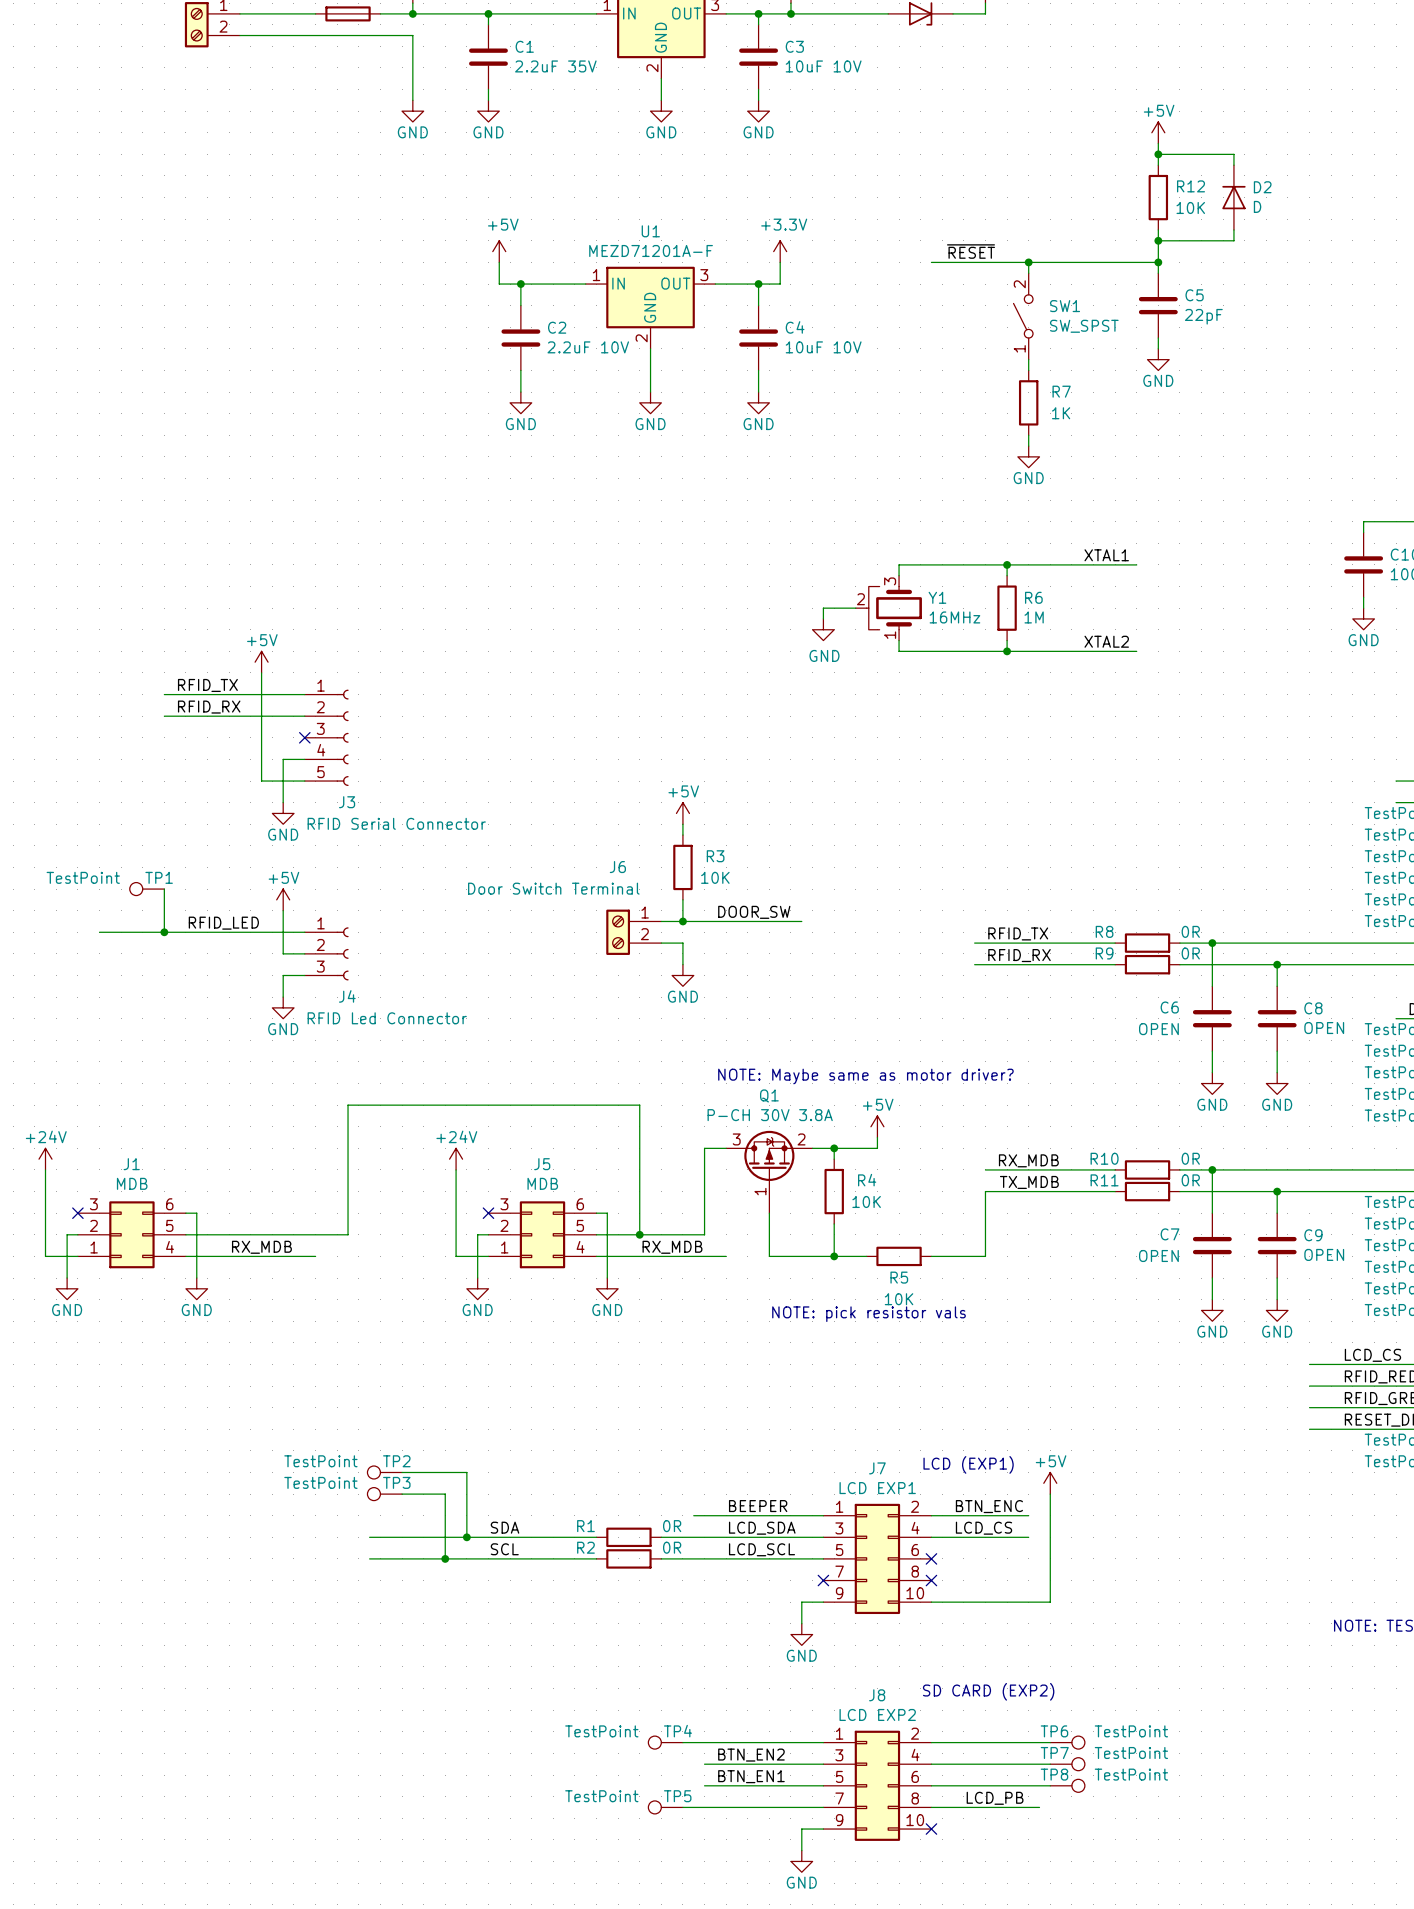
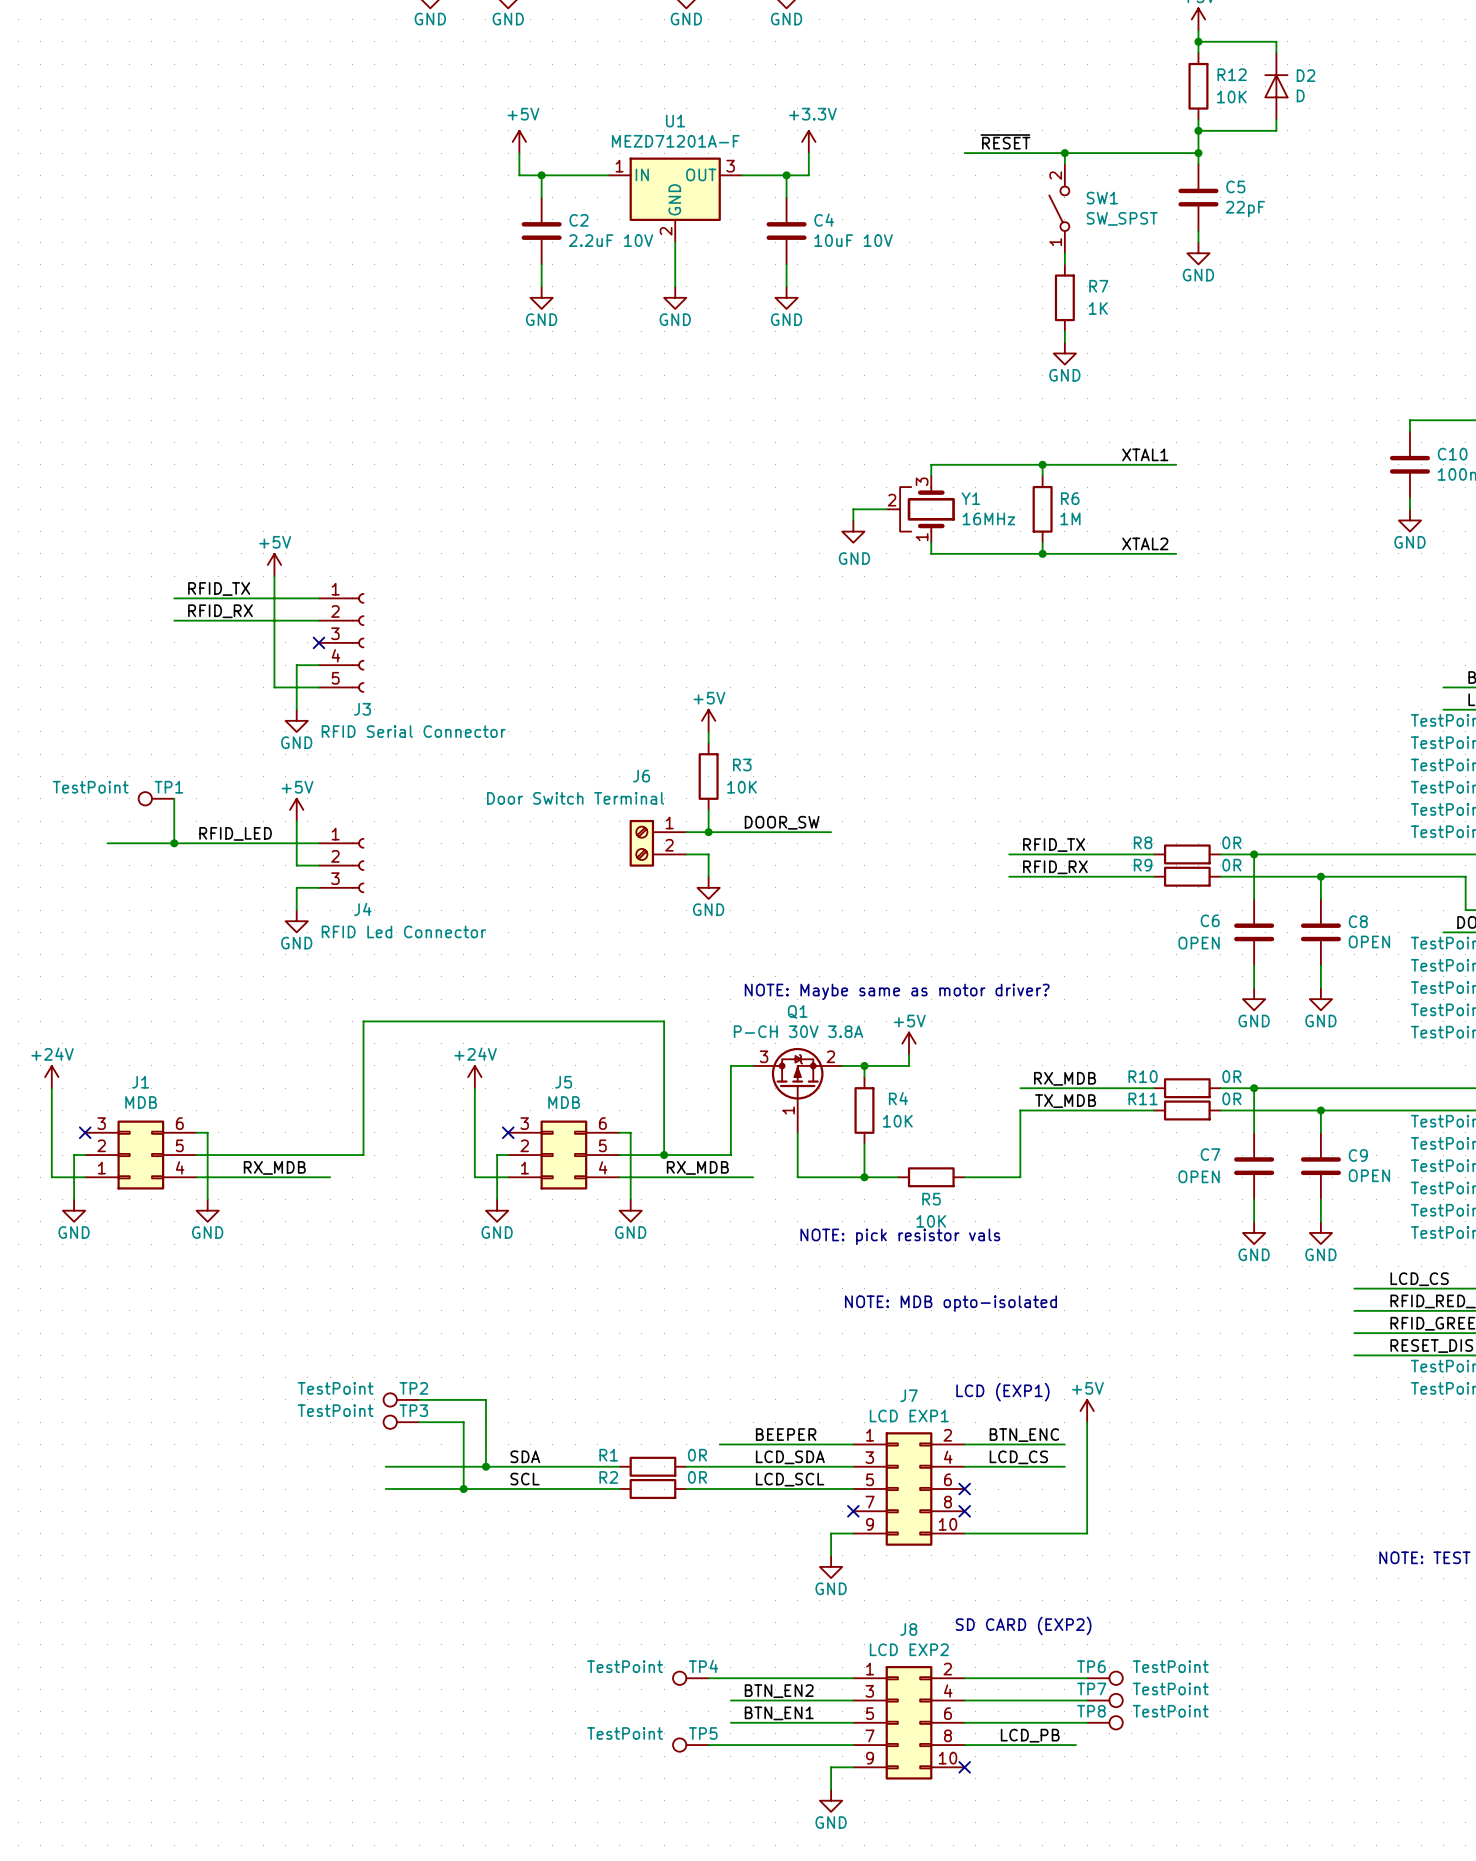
text: none -> NOTE: MDB opto-isolated (950, 1303)

